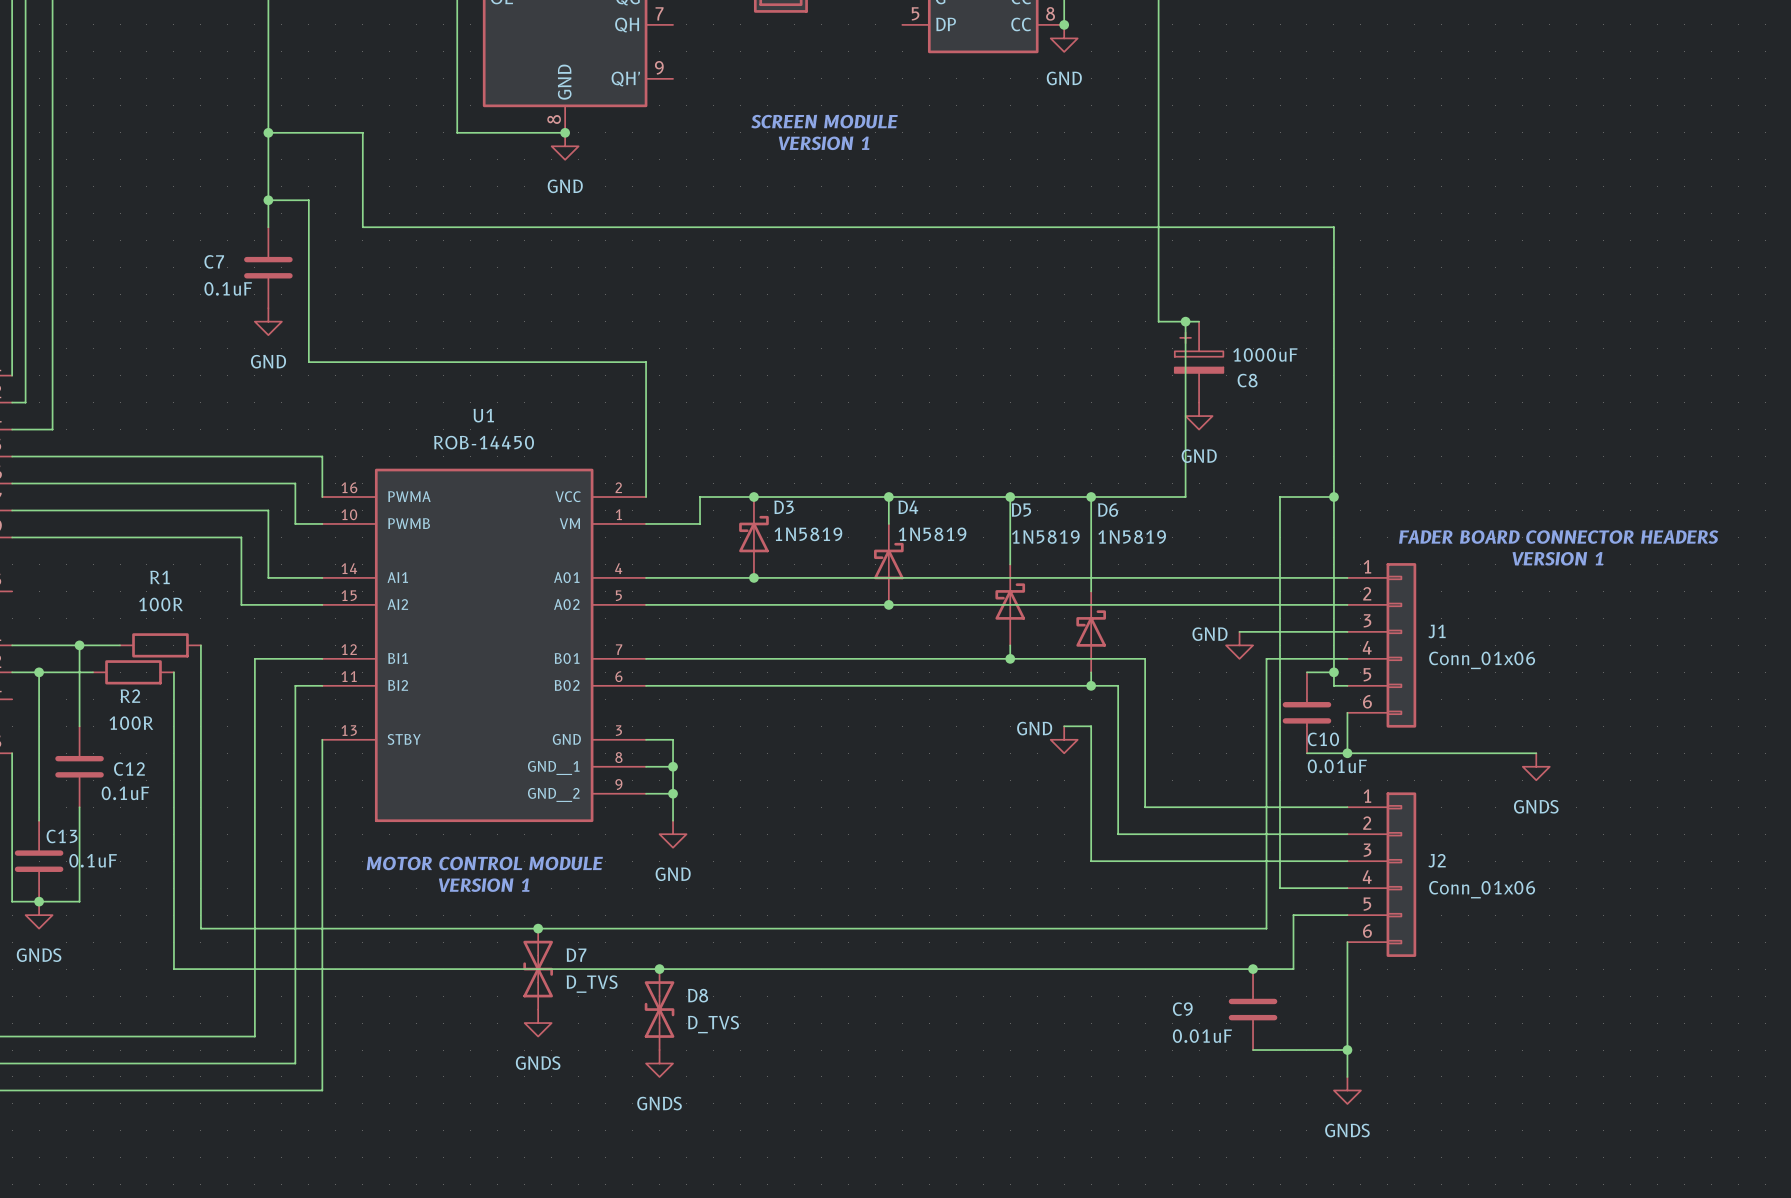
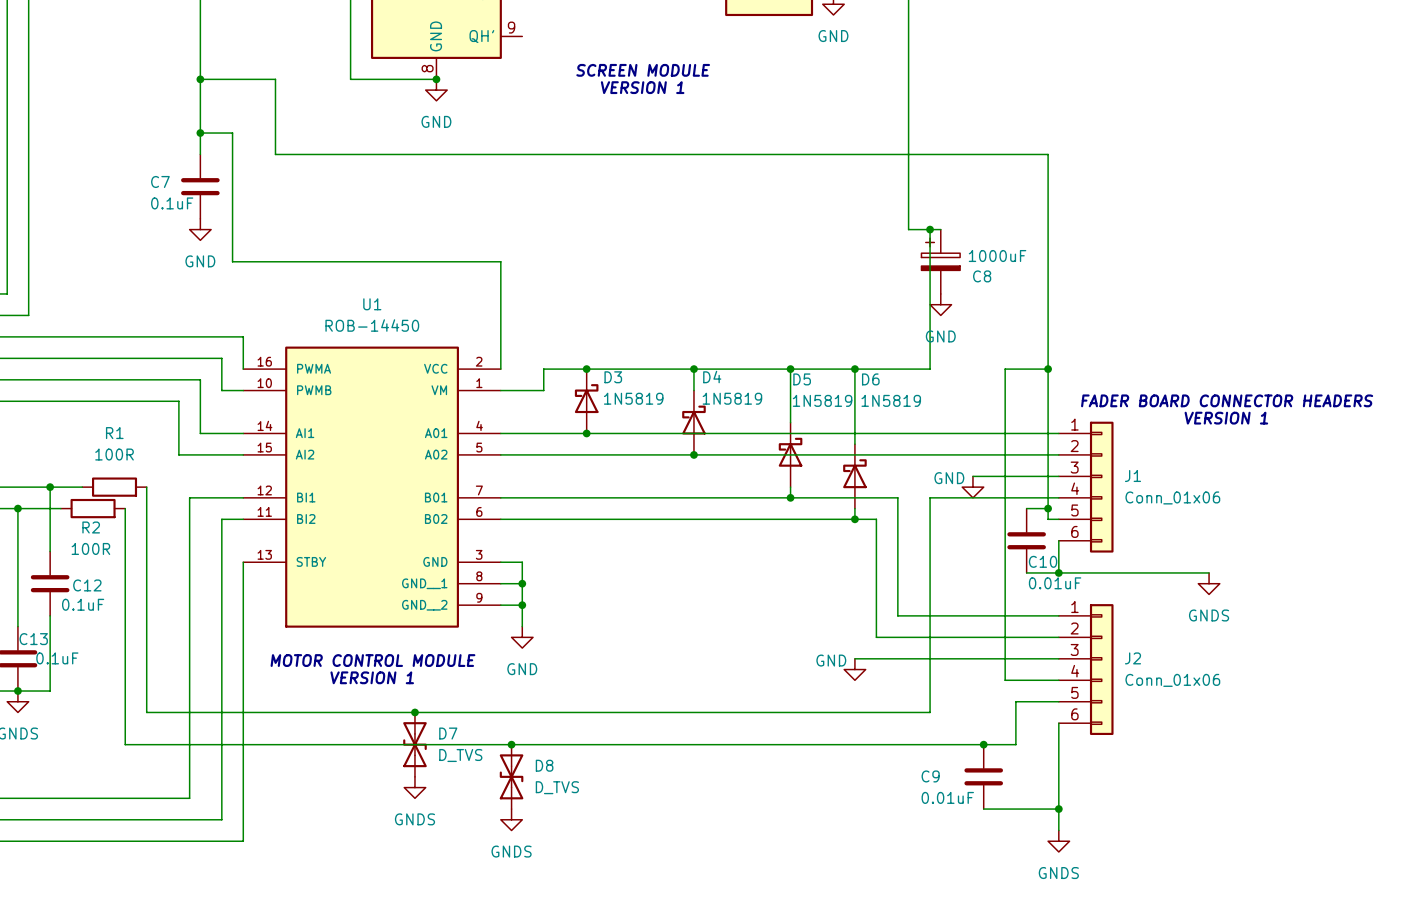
wire: (1266, 658) (1266, 928) (1185, 928) -> (994, 497) (930, 497) (930, 712)
wire: (1064, 726) (1091, 726) (1091, 861) -> none
power symbol position: GND (1064, 739) -> GND (854, 669)

